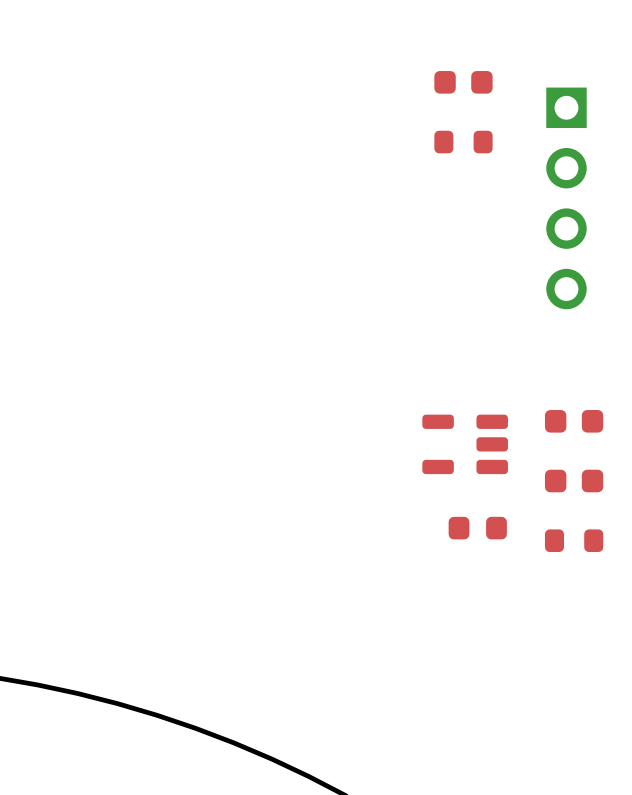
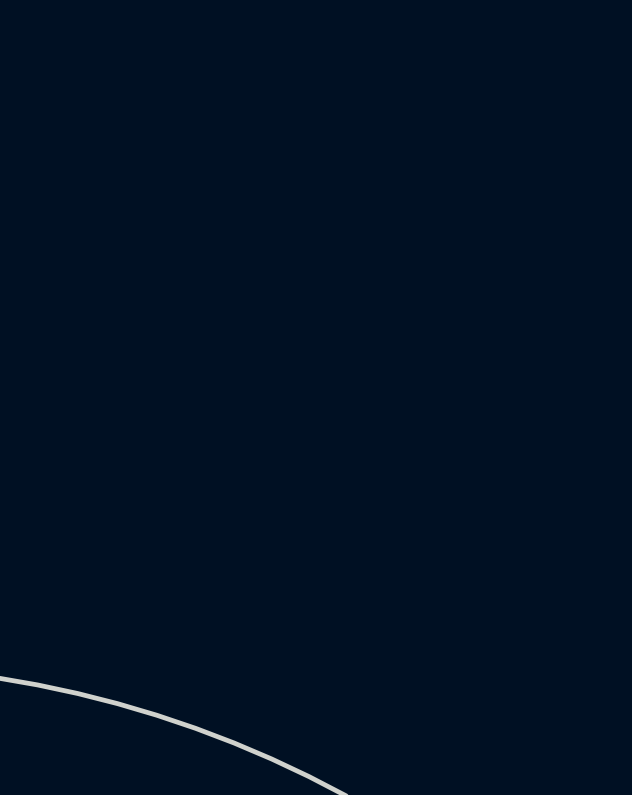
part: (463, 82) -> none
part: (463, 142) -> none
part: (566, 198) -> none
part: (574, 421) -> none
part: (465, 444) -> none
part: (574, 481) -> none
part: (477, 528) -> none
part: (574, 540) -> none

